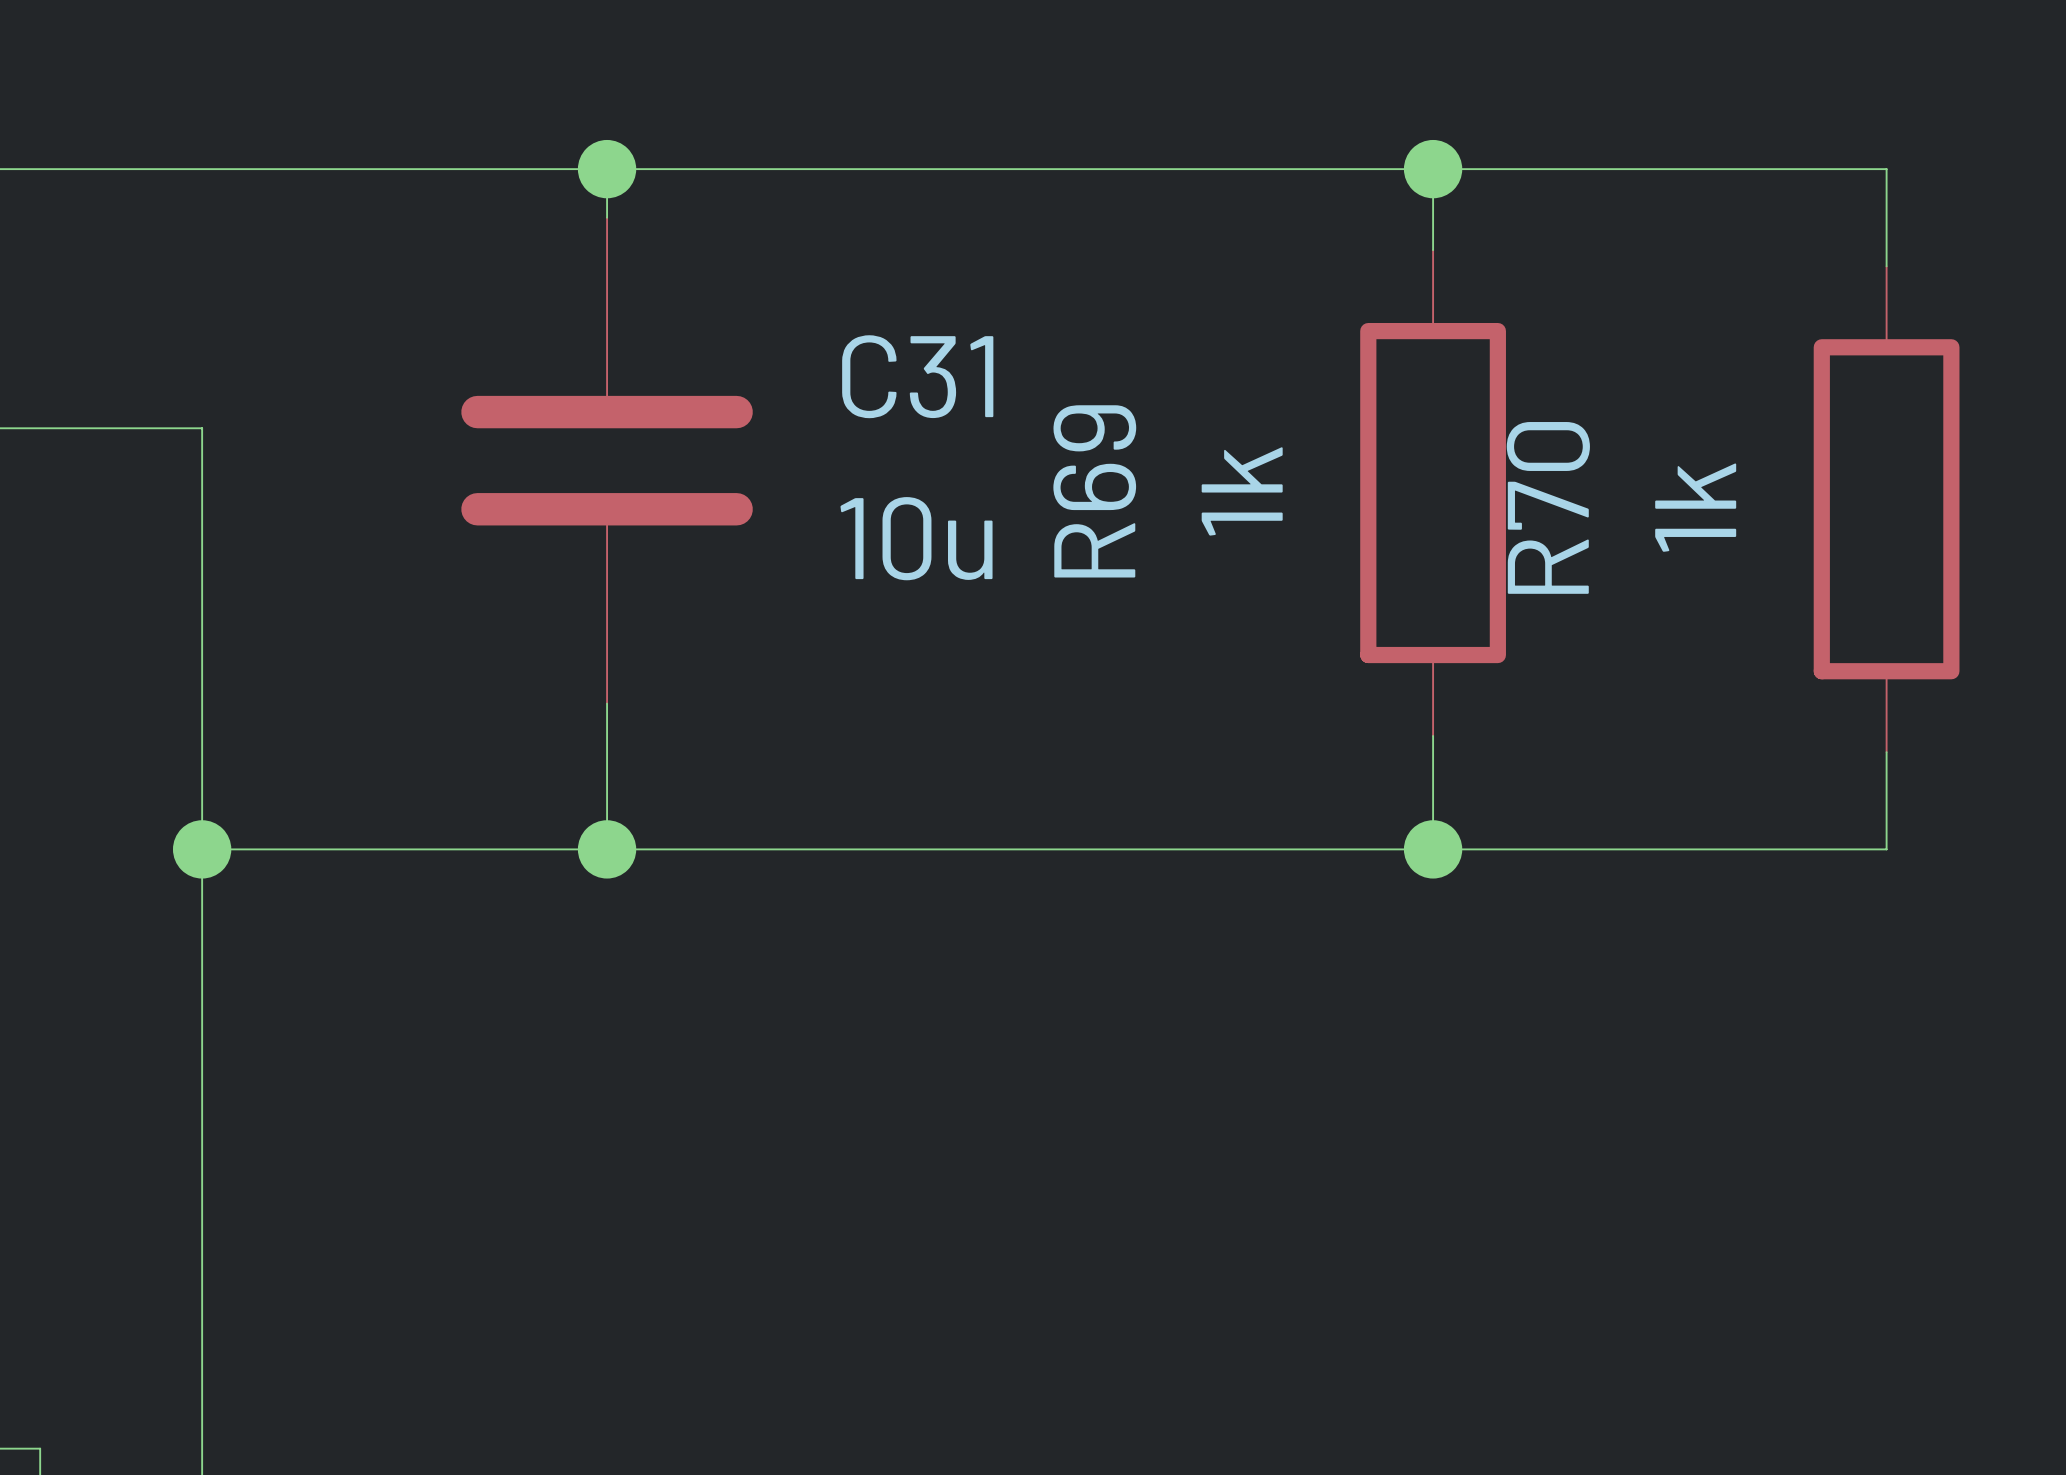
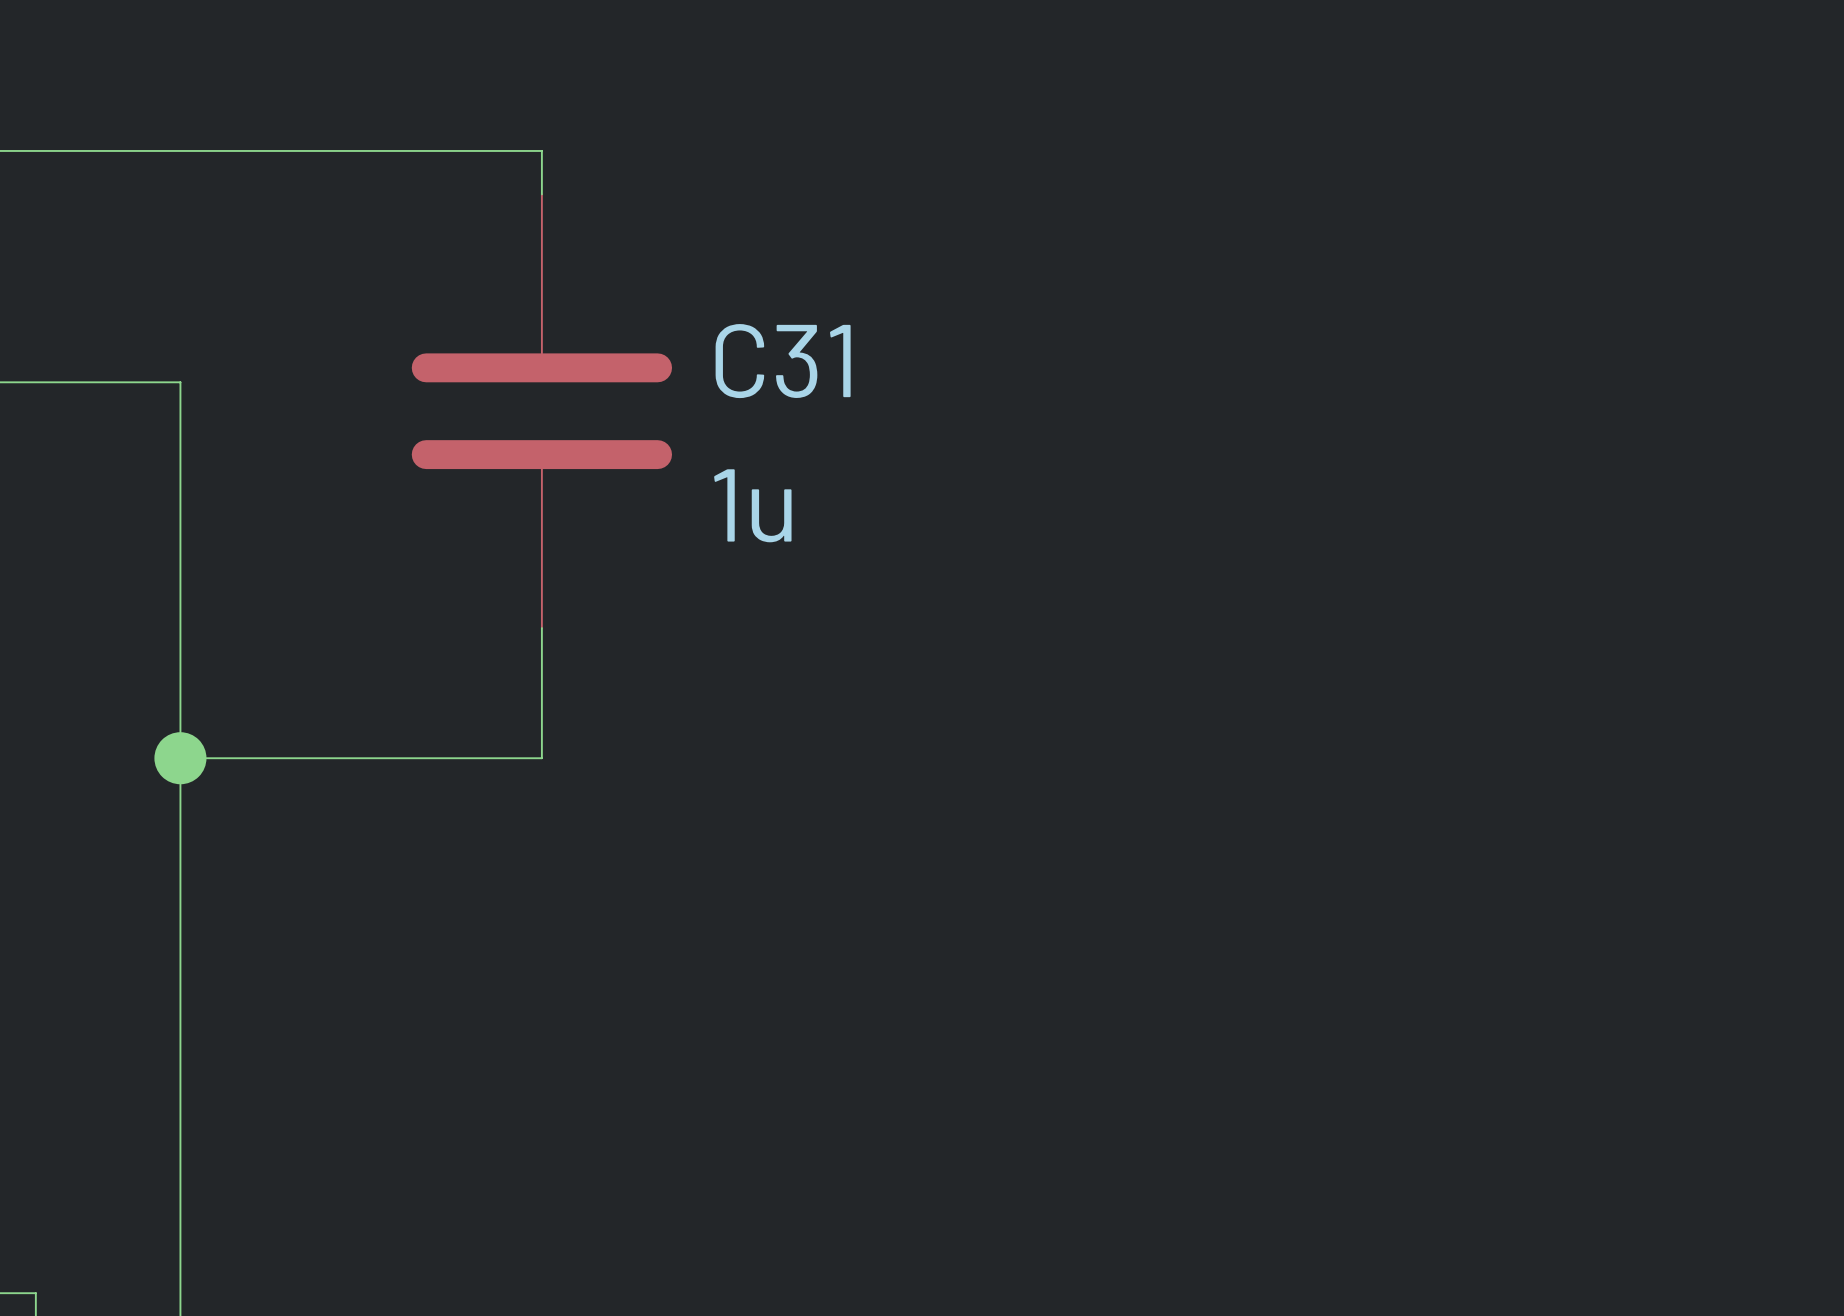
wire: (607, 169) (1886, 169) (1886, 266) -> none
junction: (607, 169) -> none
wire: (1433, 169) (1433, 250) -> none
junction: (1433, 169) -> none
C31 name position: C31 (917, 376) -> C31 (783, 361)
R69: 1k (1433, 493) -> none
R70: 1k (1886, 509) -> none
C31 value: 10u (916, 538) -> 1u (752, 505)
wire: (1433, 736) (1433, 849) -> none
wire: (1886, 752) (1886, 849) (607, 849) -> none
junction: (607, 849) -> none
junction: (1433, 849) -> none

